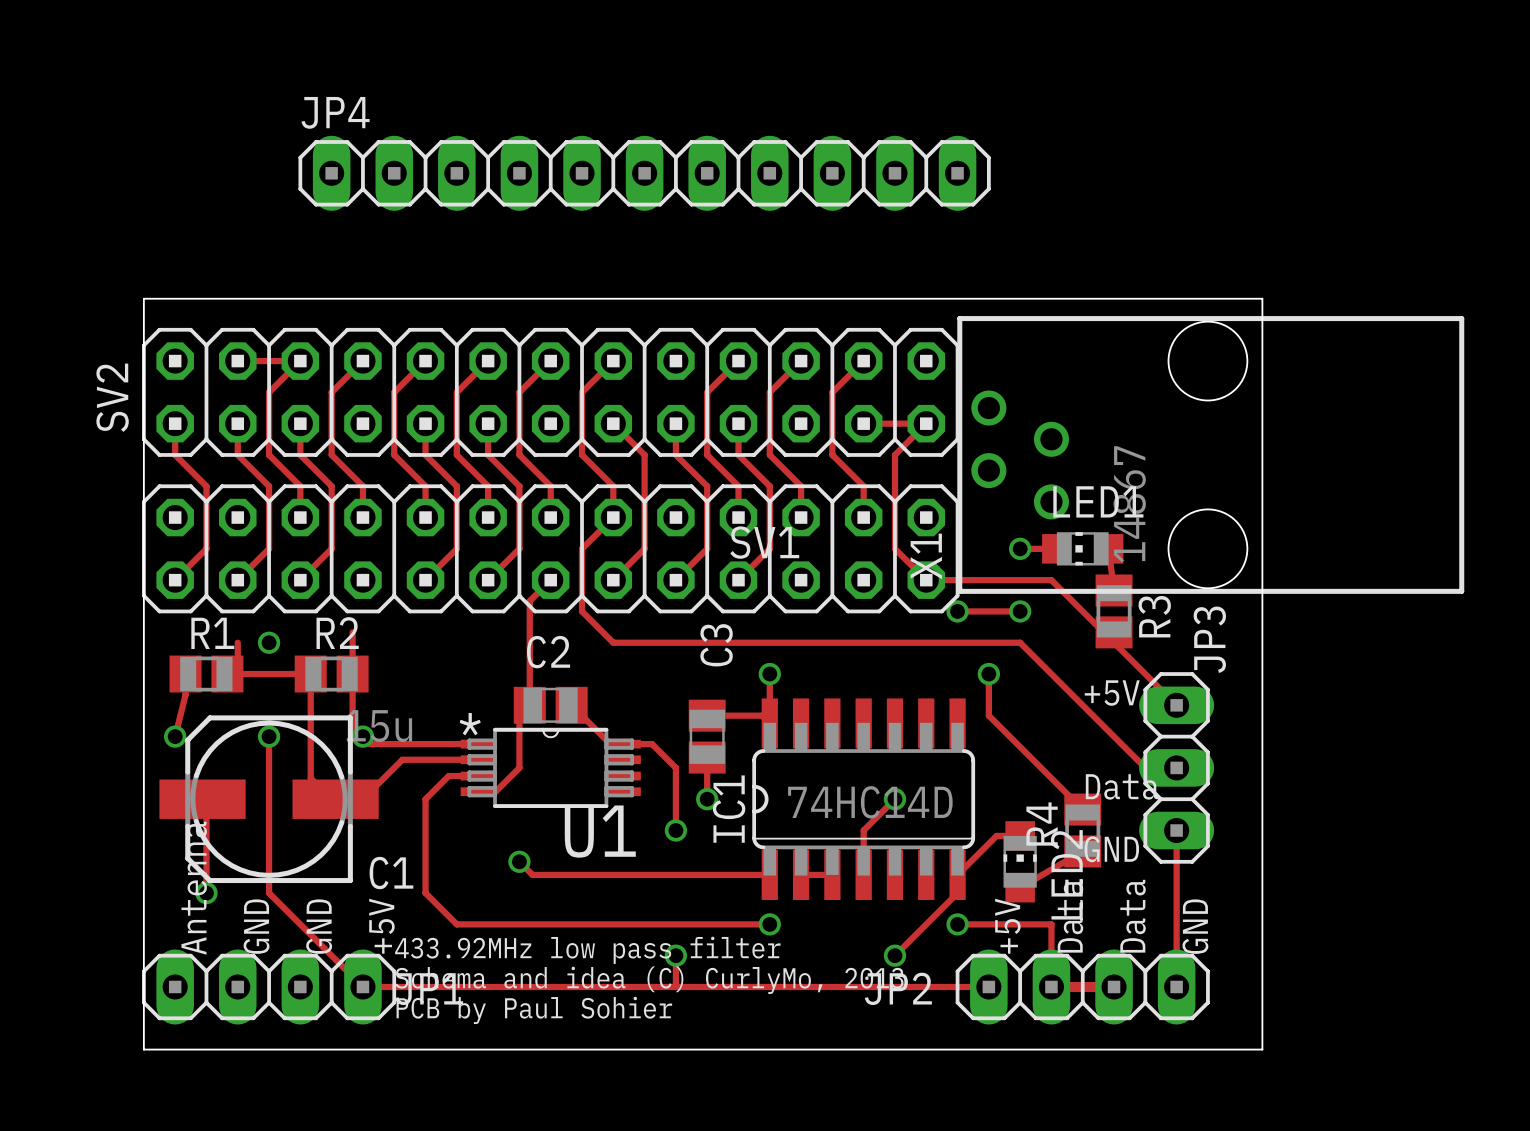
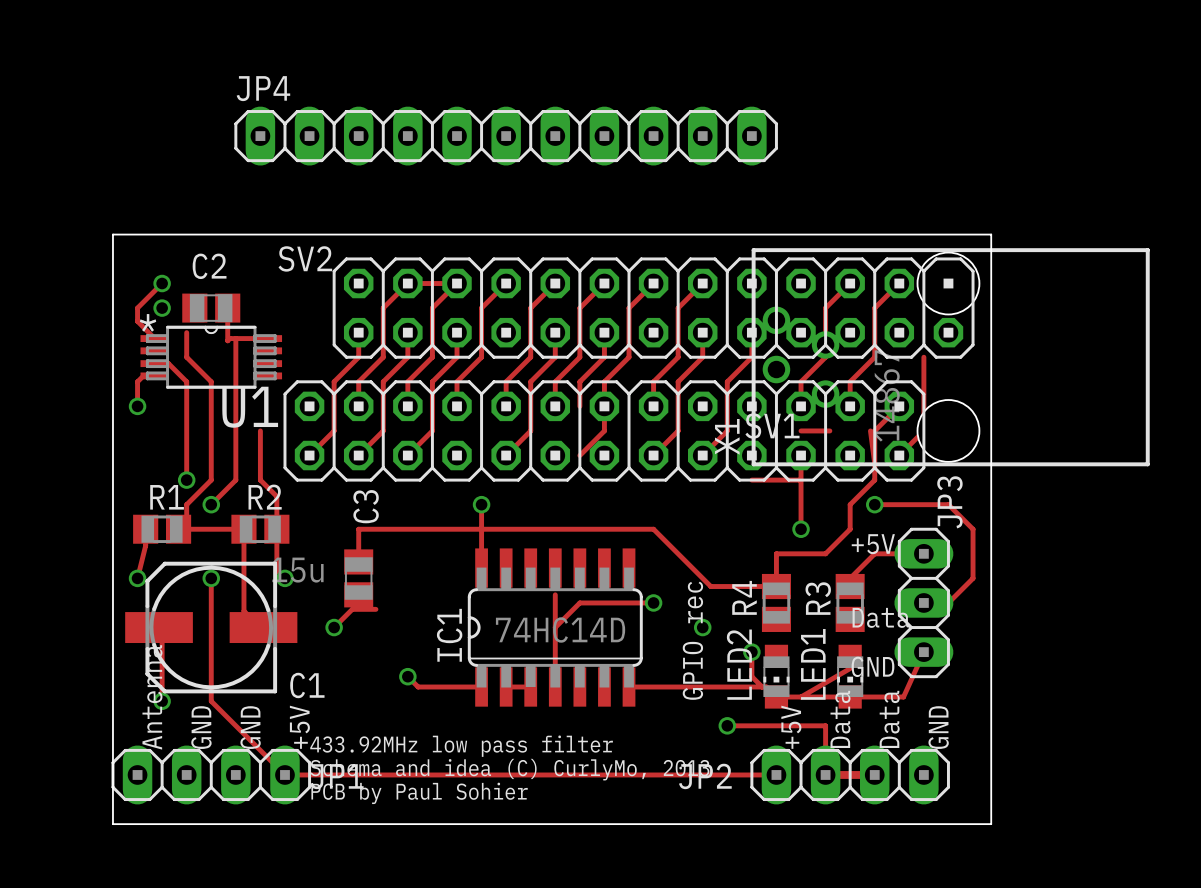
track: none -> (162, 283) (137, 308) (137, 321) (154, 338)
via: none -> (162, 283)
track: (237, 361) (300, 361) (269, 392) (269, 454) (300, 486) -> none
track: (362, 361) (331, 392) (331, 454) (362, 486) (362, 517) -> none
track: (425, 361) (394, 392) (394, 454) (425, 486) -> none
track: (488, 361) (456, 392) (456, 423) -> none
track: (550, 361) (519, 392) (519, 423) -> none
track: (613, 361) (582, 392) (582, 423) -> none
track: none -> (506, 283) (481, 308) (481, 357) (457, 381) (457, 406)
track: (738, 361) (707, 392) (707, 423) -> (555, 283) (530, 308) (530, 332)
track: (801, 361) (769, 392) (769, 423) -> (604, 283) (579, 308) (579, 332)
track: none -> (653, 283) (629, 308) (629, 357) (604, 381)
track: (863, 361) (832, 392) (832, 454) (863, 486) -> (702, 332) (702, 357) (678, 381)
track: none -> (702, 283) (678, 308) (678, 357) (653, 381) (653, 406)
track: none -> (850, 283) (825, 308) (825, 357) (801, 381) (801, 406)
track: none -> (899, 283) (874, 308) (874, 357) (850, 381) (850, 406)
via: none -> (162, 308)
track: none -> (227, 308) (227, 340) (229, 338) (267, 338)
SV2 position: (550, 392) -> (653, 308)
SV2 name rotation: 0° (112, 397) -> 90° clockwise (305, 258)
track: (175, 423) (175, 454) (206, 486) (206, 548) (175, 580) -> none
track: (425, 423) (425, 454) (456, 486) -> (383, 357) (358, 381)
track: (613, 423) (644, 454) (644, 486) -> none
track: (863, 423) (926, 423) (894, 454) (894, 548) (926, 580) (1051, 580) (1103, 632) (1114, 632) (1114, 642) (1176, 705) -> (850, 586) (850, 578) (874, 553) (923, 553)
track: none -> (751, 332) (751, 357) (727, 381) (727, 430) (702, 455)
track: (300, 454) (331, 486) (331, 548) (300, 580) -> (235, 357) (235, 381)
track: (456, 454) (488, 486) -> (358, 357) (334, 381)
track: (488, 454) (519, 486) -> (383, 332) (383, 308) (407, 283) (457, 283) (432, 308) (432, 357) (407, 381)
track: (519, 454) (550, 486) -> (407, 357) (383, 381)
track: (582, 454) (613, 486) (613, 517) (582, 548) (582, 611) (613, 642) (1020, 642) (1145, 767) (1176, 767) -> (874, 504) (948, 504) (973, 529) (973, 578) (948, 602) (923, 602)
track: none -> (457, 357) (432, 381)
track: (675, 454) (707, 486) -> (530, 357) (506, 381)
track: (707, 454) (738, 486) -> (604, 357) (579, 381)
track: none -> (555, 357) (530, 381) (530, 430) (506, 455)
track: (738, 454) (769, 486) -> (579, 357) (555, 381)
track: (769, 454) (801, 486) (801, 517) -> none
track: none -> (923, 357) (923, 430) (899, 455)
track: none -> (154, 363) (168, 363) (186, 381) (186, 480)
track: none -> (154, 375) (143, 375) (137, 381) (137, 406)
via: none -> (137, 406)
track: none -> (235, 406) (235, 480) (211, 504)
track: (456, 517) (456, 548) (425, 580) -> (334, 406) (334, 430) (309, 455)
track: (519, 517) (519, 548) (488, 580) -> (383, 406) (383, 430) (358, 455)
track: (644, 517) (644, 548) (613, 580) -> (432, 406) (432, 430) (407, 455)
track: (707, 517) (707, 548) (675, 580) -> (678, 406) (678, 430) (653, 455)
track: (269, 548) (237, 580) -> (211, 430) (211, 480) (186, 504)
track: none -> (260, 430) (260, 480) (276, 496)
SV1 position: (550, 548) -> (604, 430)
via: (1020, 548) -> none
LED1 rotation: 0° (1082, 548) -> 90° counterclockwise (850, 676)
LED1 position: (1082, 548) -> (850, 676)
track: (550, 580) (529, 601) (529, 705) (519, 715) (519, 767) (495, 791) (478, 791) -> none
track: none -> (801, 455) (801, 529)
via: none -> (186, 480)
via: (957, 611) -> none
via: (1020, 611) -> none
R3 position: (1114, 611) -> (850, 602)
R3 name position: R3 (1154, 616) -> R3 (818, 598)
track: none -> (481, 504) (481, 568)
via: none -> (481, 504)
via: none -> (874, 504)
track: (769, 674) (769, 723) (761, 715) (707, 715) -> none
via: (769, 674) -> none
track: (988, 674) (988, 705) -> (899, 406) (874, 430) (874, 480) (850, 504) (850, 529) (825, 553) (776, 553)
via: (988, 674) -> none
via: none -> (801, 529)
C2 position: (550, 705) -> (211, 308)
track: (571, 705) (610, 744) (652, 744) (675, 767) (675, 830) -> none
track: (988, 715) (1082, 809) -> (776, 561) (776, 586) (710, 586) (653, 529) (358, 529) (358, 561) (366, 553)
track: (362, 736) (370, 744) (478, 744) -> none
C3 position: (707, 736) -> (358, 578)
track: (478, 759) (402, 759) (362, 799) -> none
U1 position: (550, 767) -> (211, 357)
track: none -> (653, 602) (579, 602) (555, 627) (555, 687)
via: none -> (653, 602)
track: (425, 799) (425, 893) (456, 924) (769, 924) -> none
via: none -> (334, 627)
via: (707, 799) -> none
IC1 position: (863, 799) -> (555, 627)
track: (894, 799) (863, 830) (863, 874) -> none
text: none -> GPIO rec (692, 640)
via: (675, 830) -> none
track: none -> (751, 652) (751, 676) (762, 687)
via: none -> (751, 652)
R4 position: (1082, 830) -> (776, 602)
track: (1176, 830) (1176, 986) -> (923, 652) (903, 697) (776, 697) (766, 687) (653, 687)
track: (1020, 835) (996, 835) (957, 874) (957, 893) (894, 955) -> none
LED2 rotation: 0° (1020, 861) -> 180° (776, 676)
track: (613, 874) (644, 874) -> (727, 725) (751, 725)
track: (675, 874) (769, 874) -> none
via: (769, 924) -> none
via: none -> (727, 725)
via: (957, 924) -> none
track: (675, 955) (675, 986) -> none
via: (675, 955) -> none
via: (894, 955) -> none

